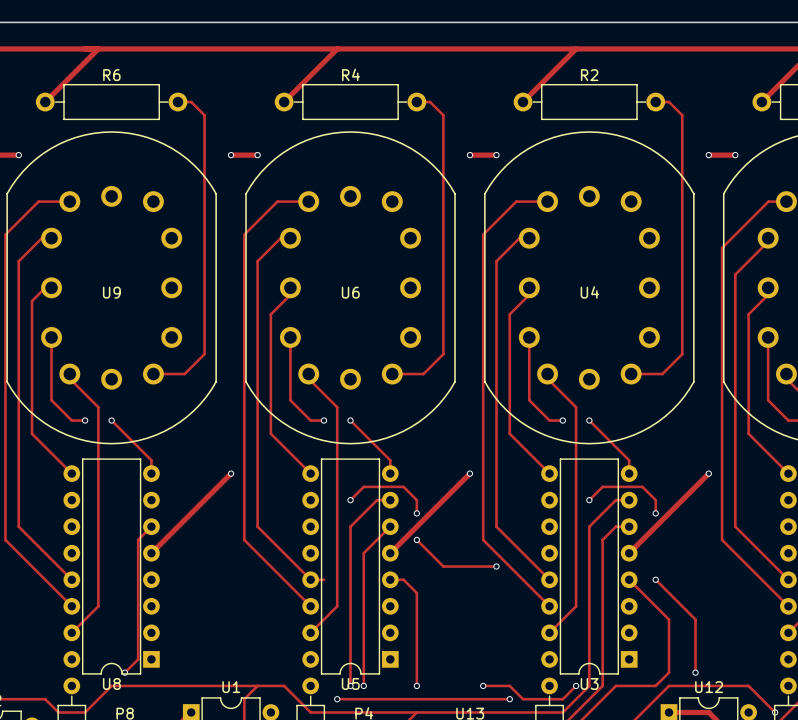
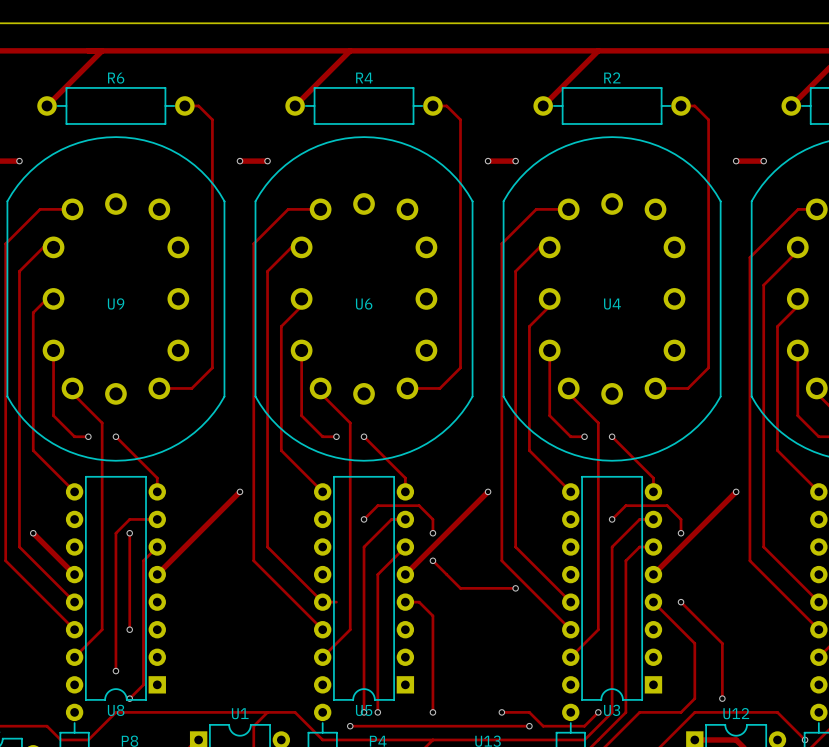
track: none -> (157, 519) (129, 519) (115, 533) (115, 671)
track: none -> (33, 533) (74, 574)
via: none -> (33, 533)
track: none -> (129, 533) (129, 629)
via: none -> (129, 533)
via: none -> (129, 629)
via: none -> (115, 671)

